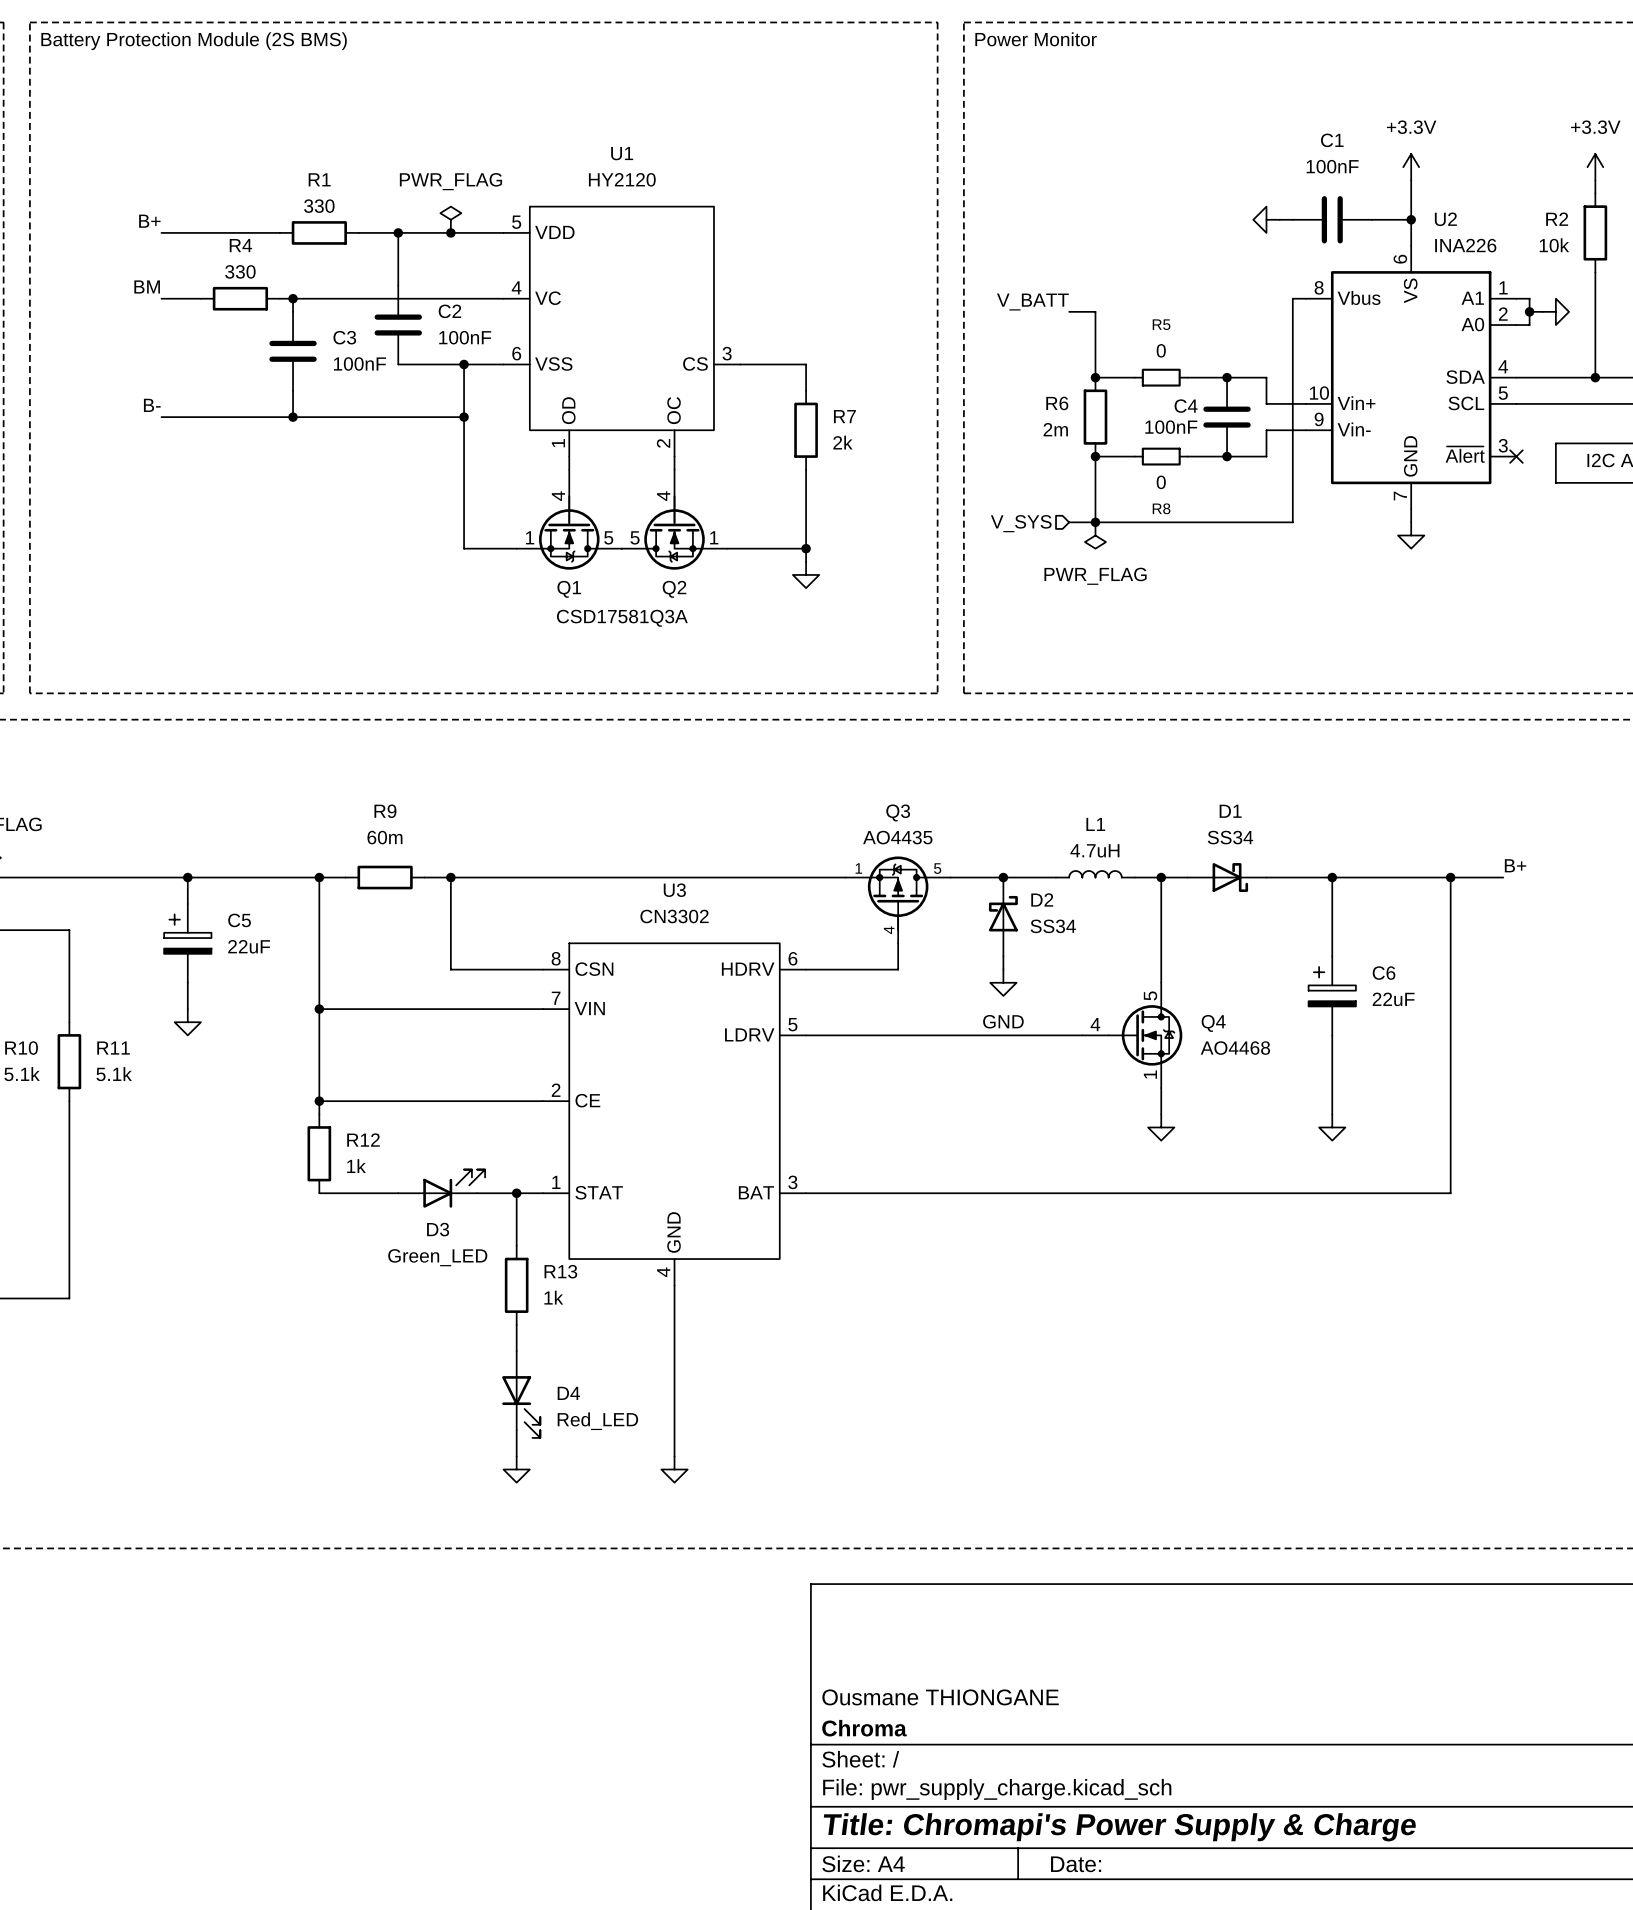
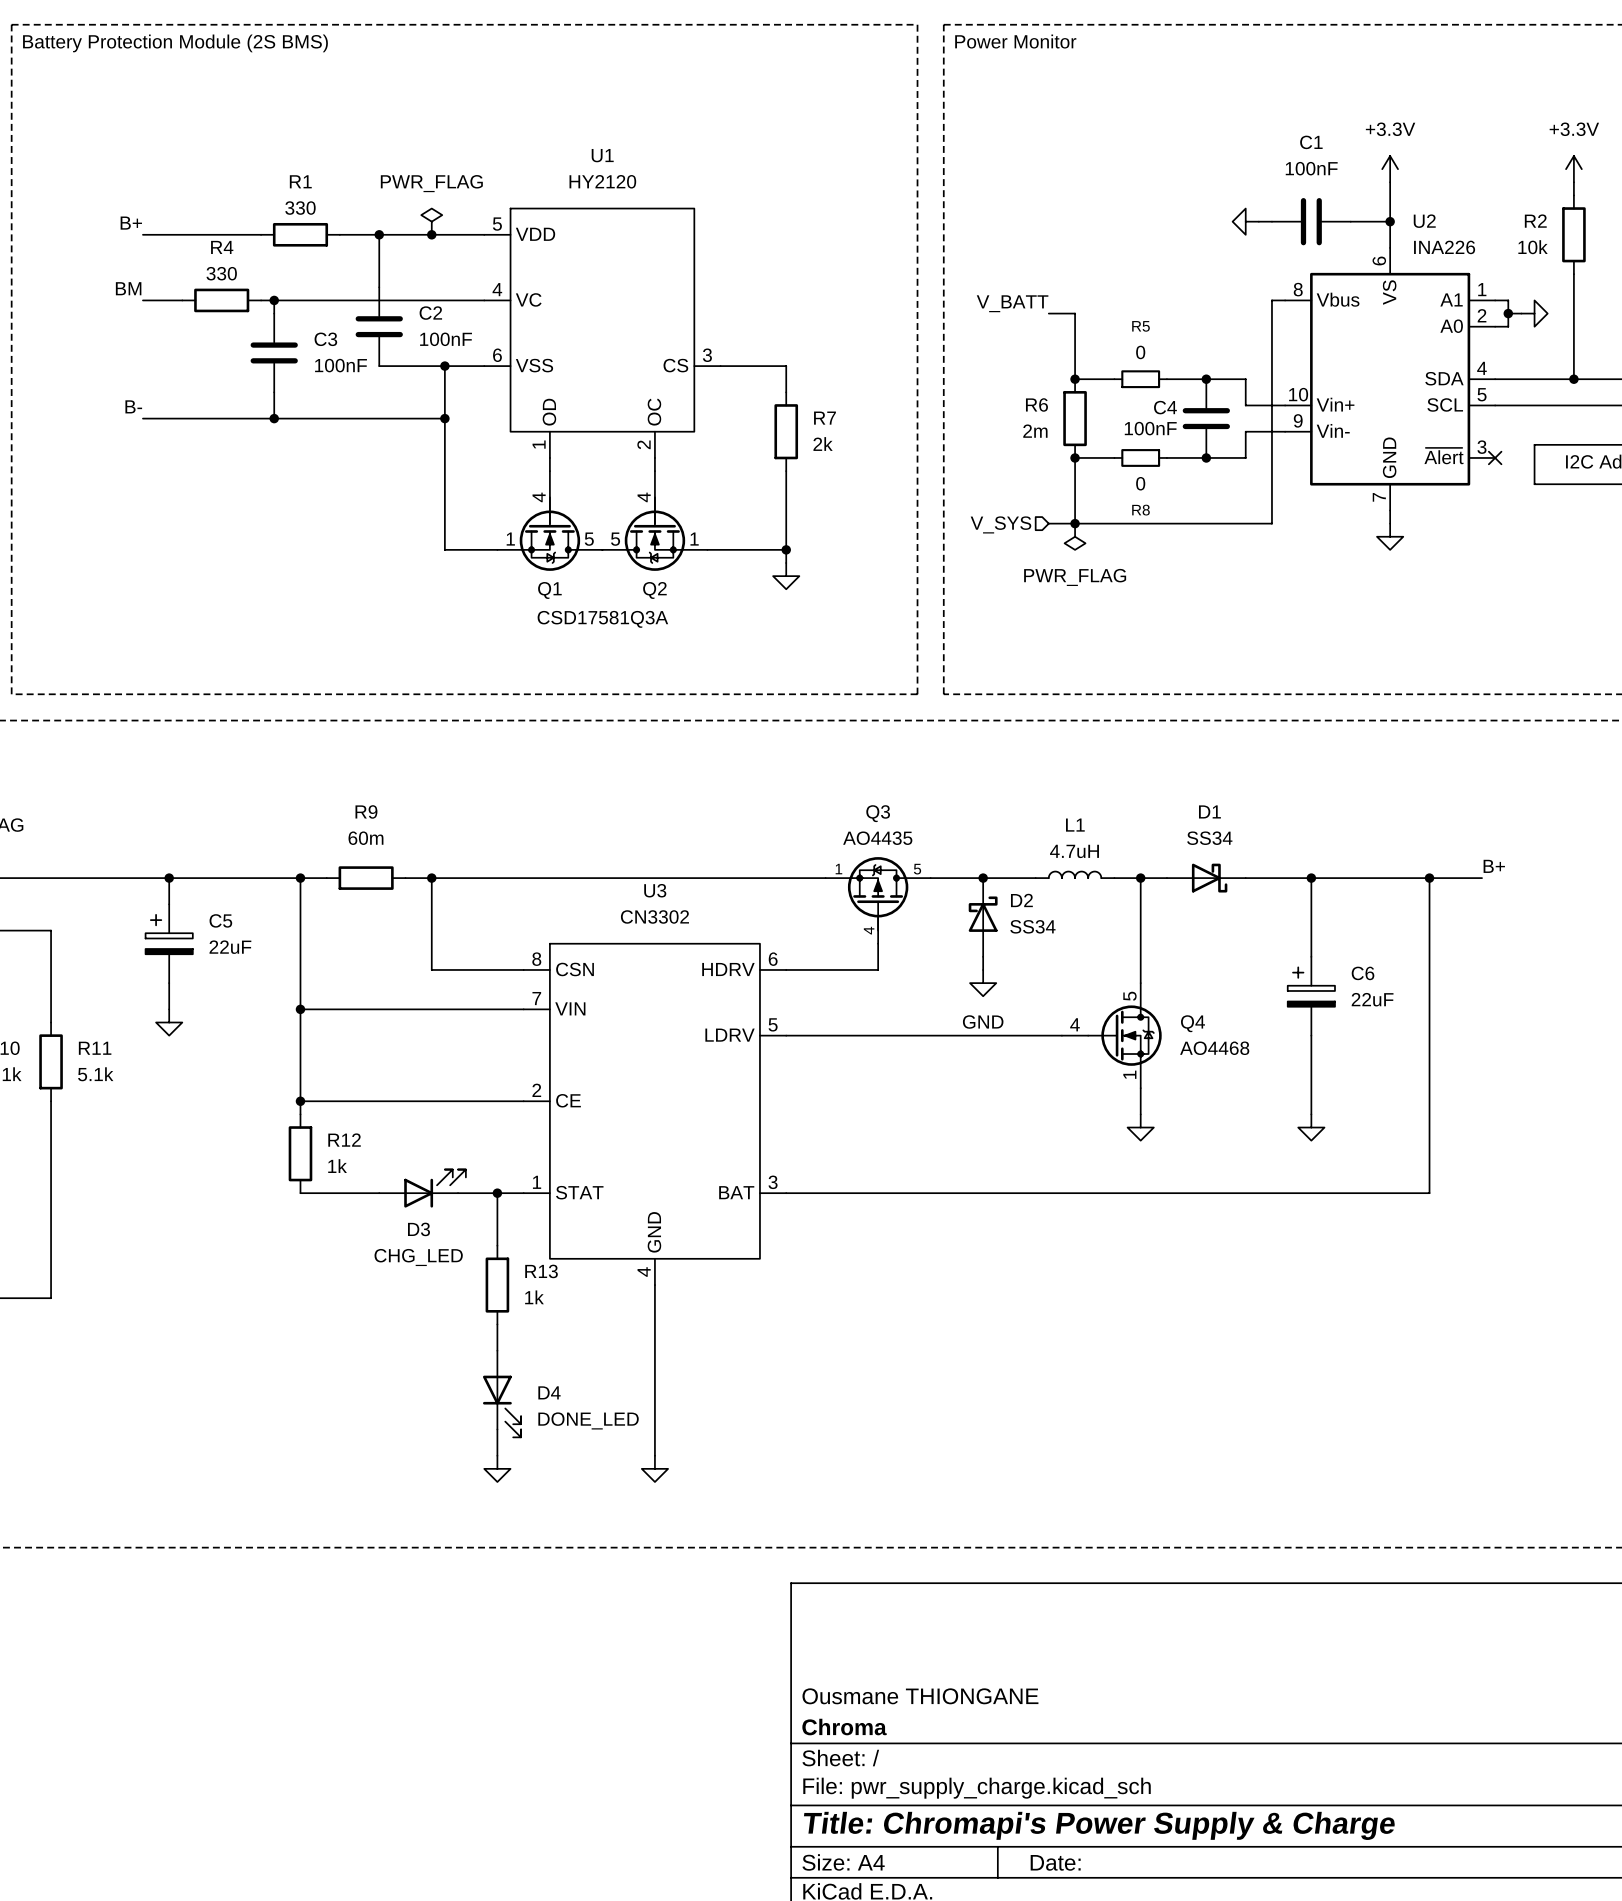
D3 value: Green_LED (437, 1257) -> CHG_LED (418, 1257)
D4 value: Red_LED (597, 1421) -> DONE_LED (588, 1420)

